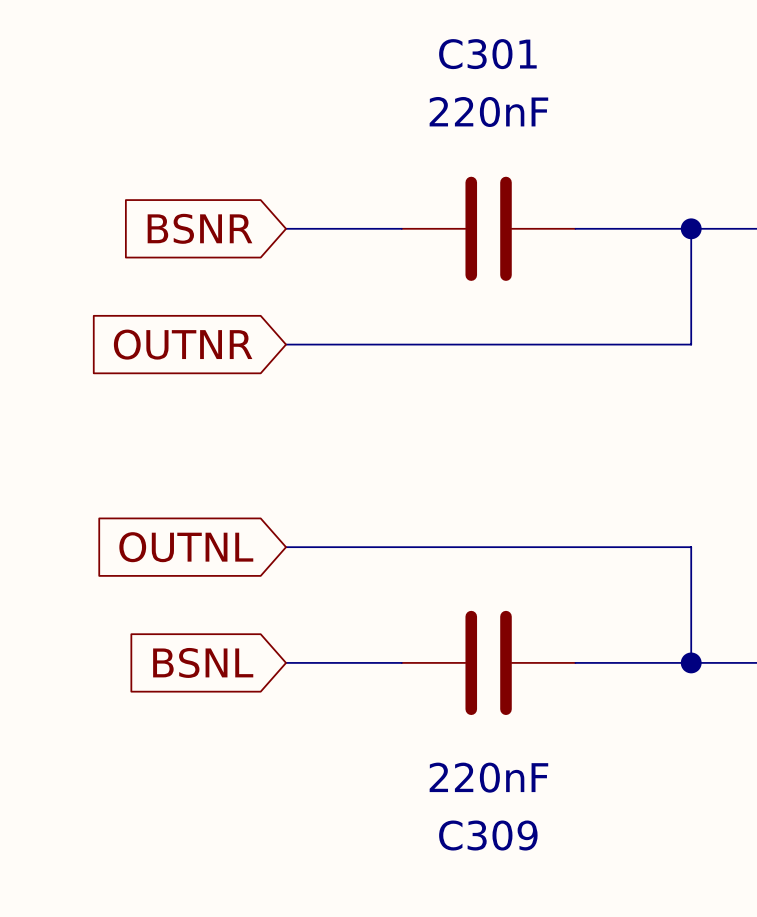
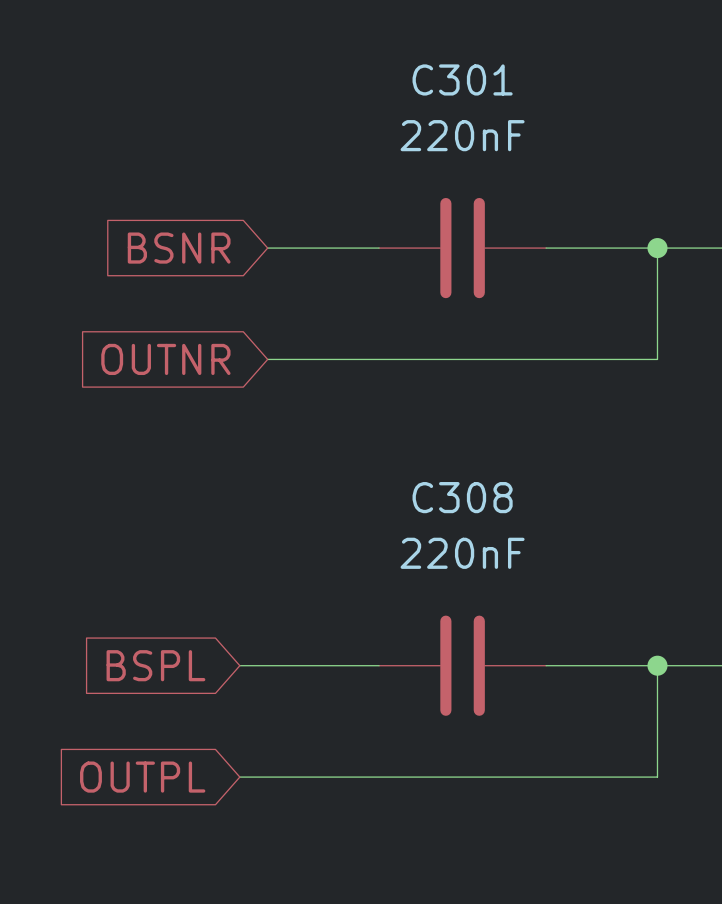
global label: OUTNL (186, 547) -> none
wire: (286, 547) (691, 547) (691, 662) -> (239, 777) (657, 777) (657, 665)
global label: BSNL (203, 662) -> BSPL (155, 665)
wire: none -> (239, 665) (267, 665)
C309 value position: 220nF (488, 777) -> 220nF (462, 553)
global label: none -> OUTPL (142, 777)
C309 name: C309 (488, 835) -> C308 (462, 497)

